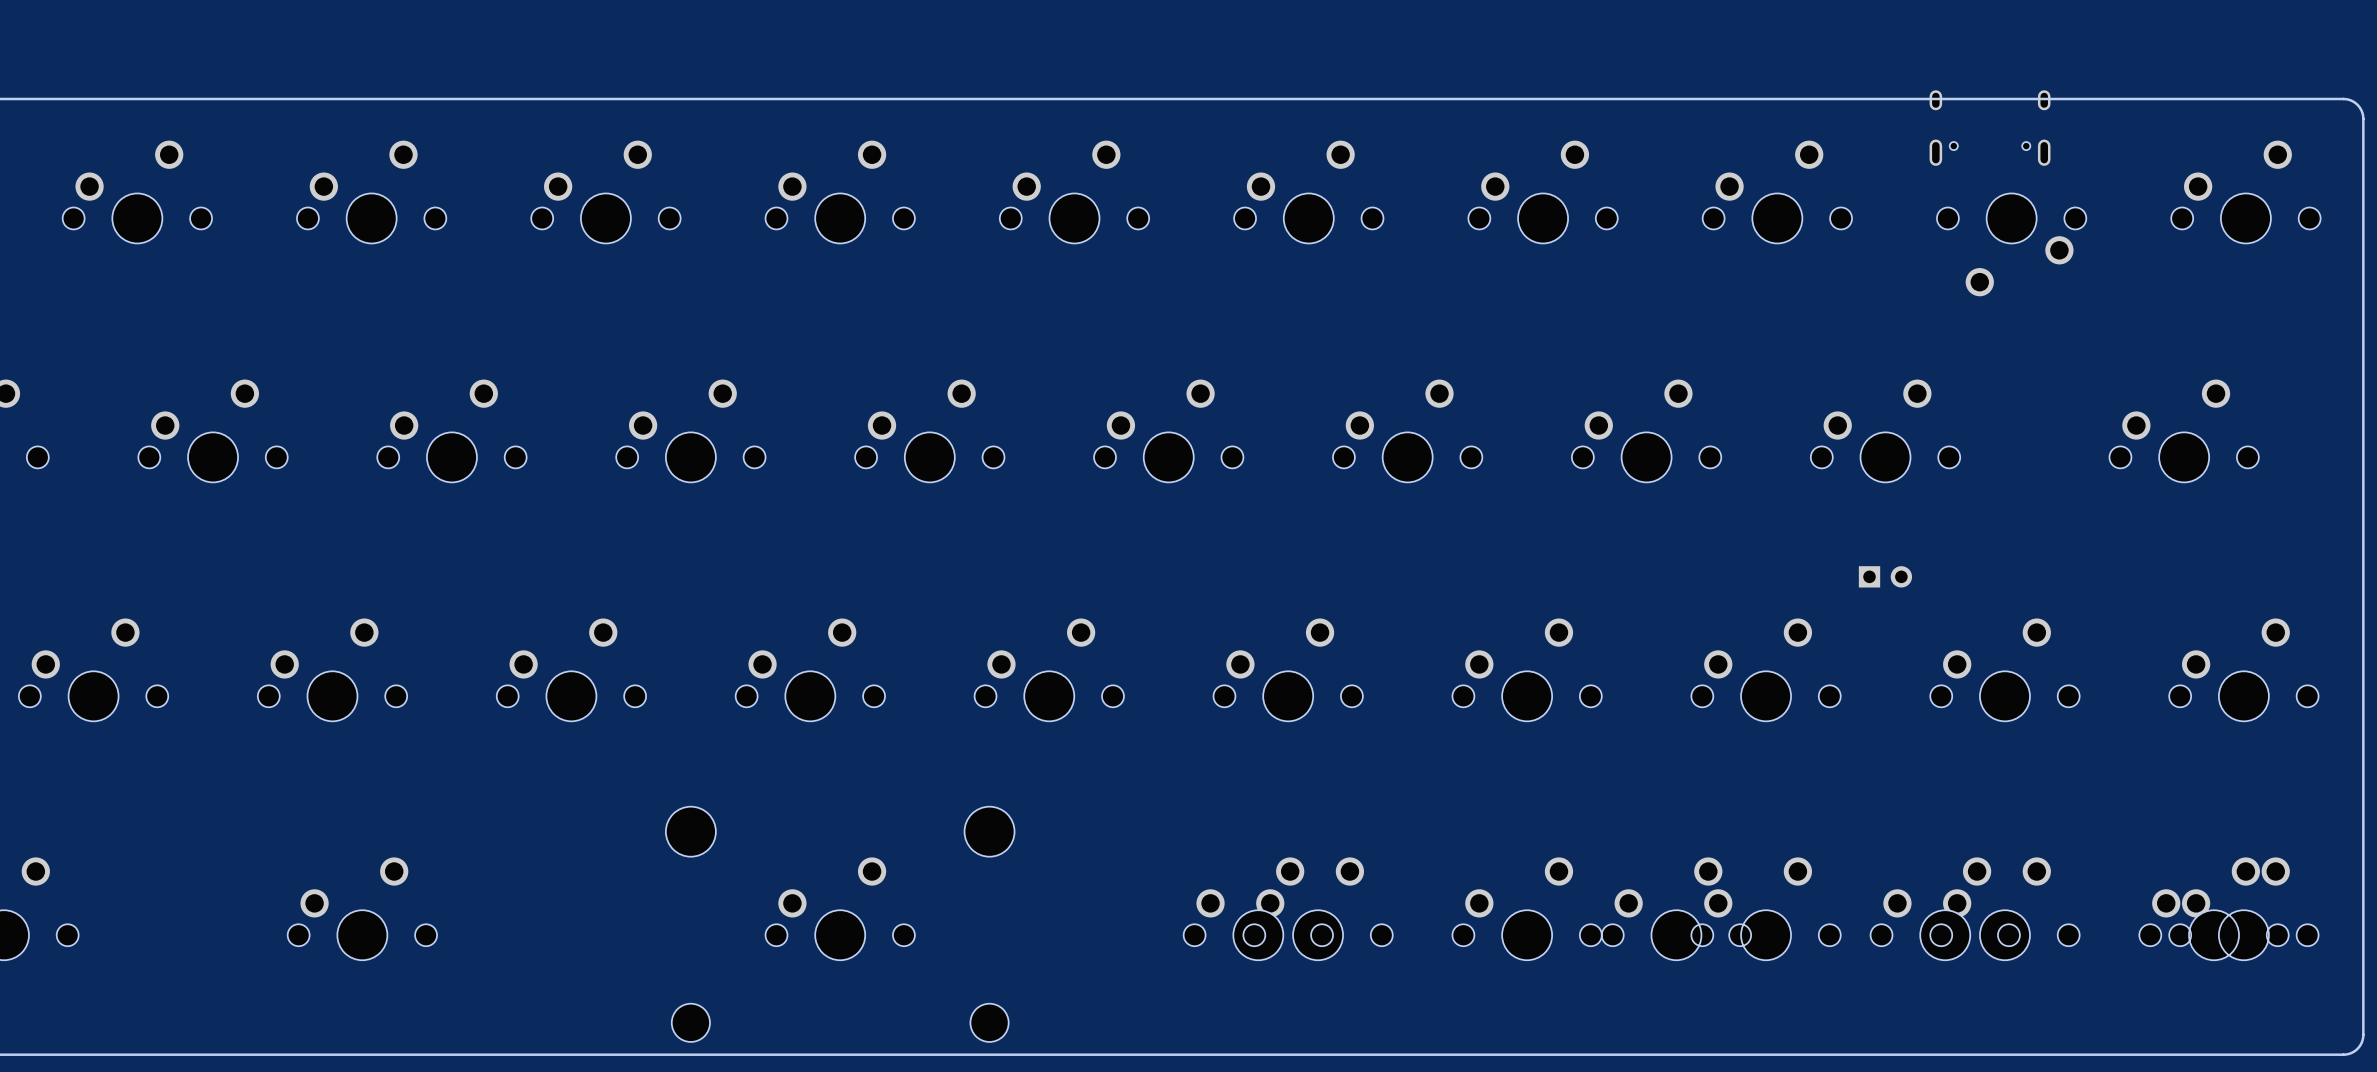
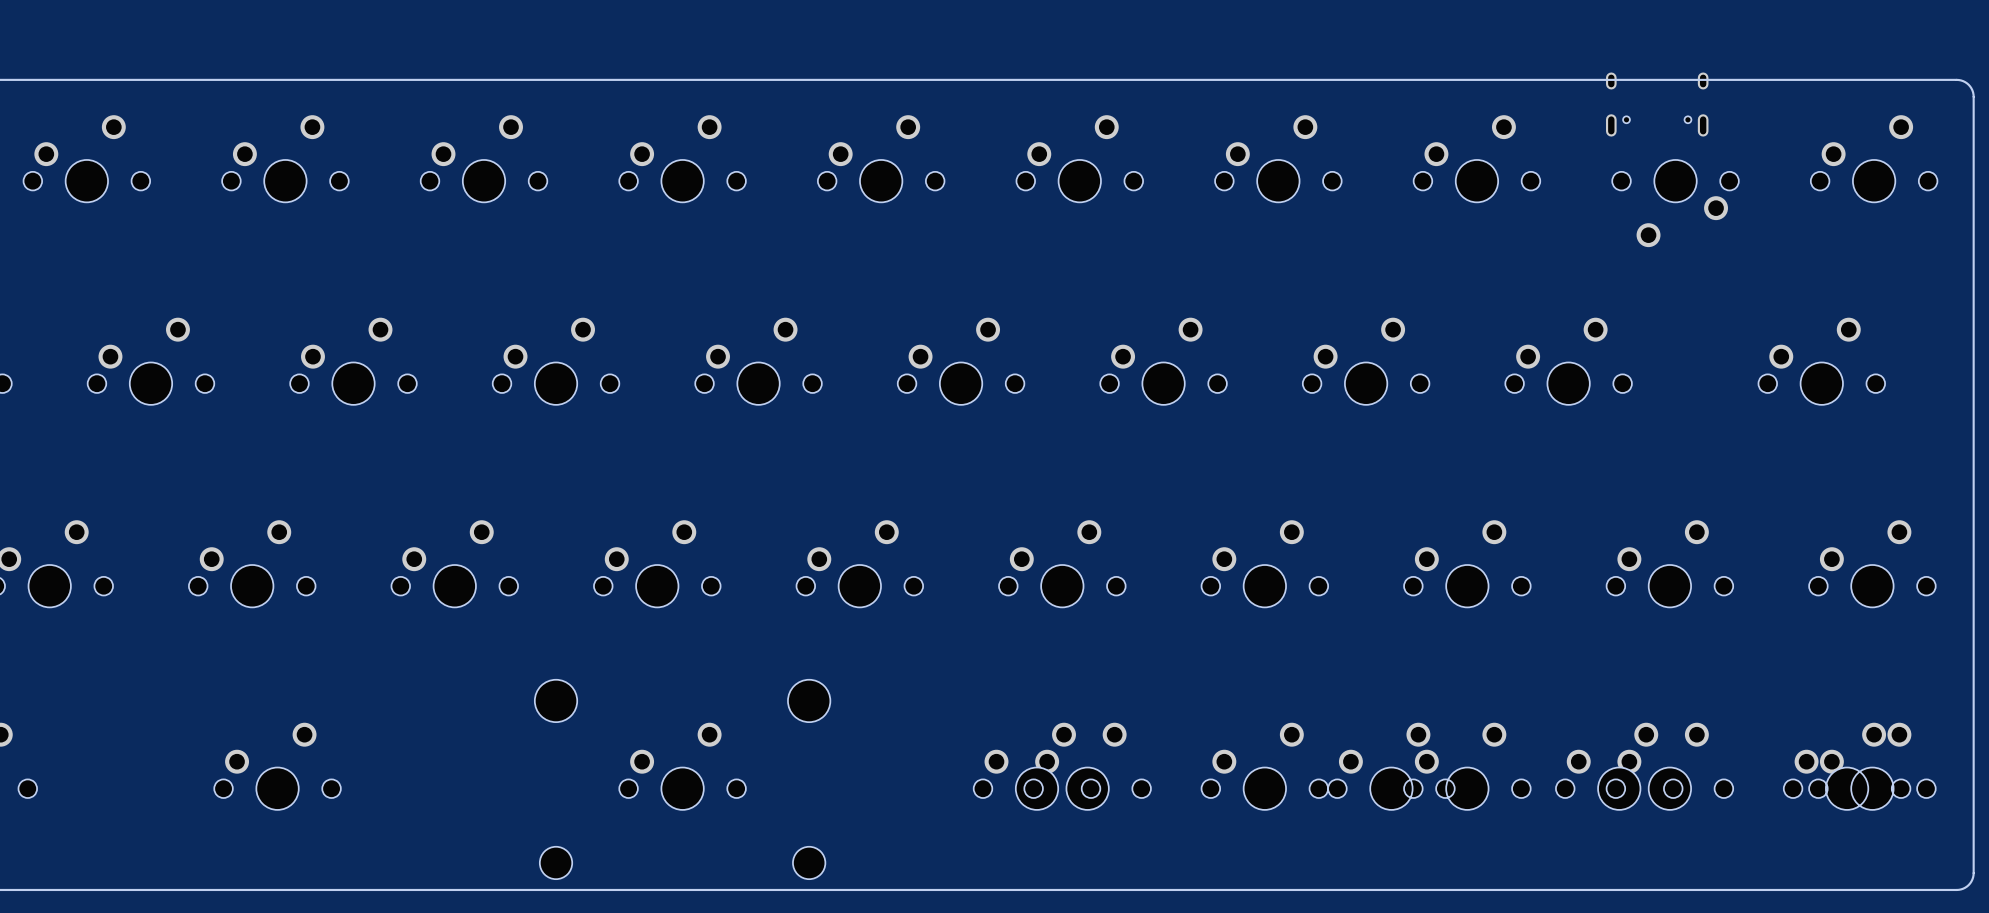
part: (1885, 576) -> none

